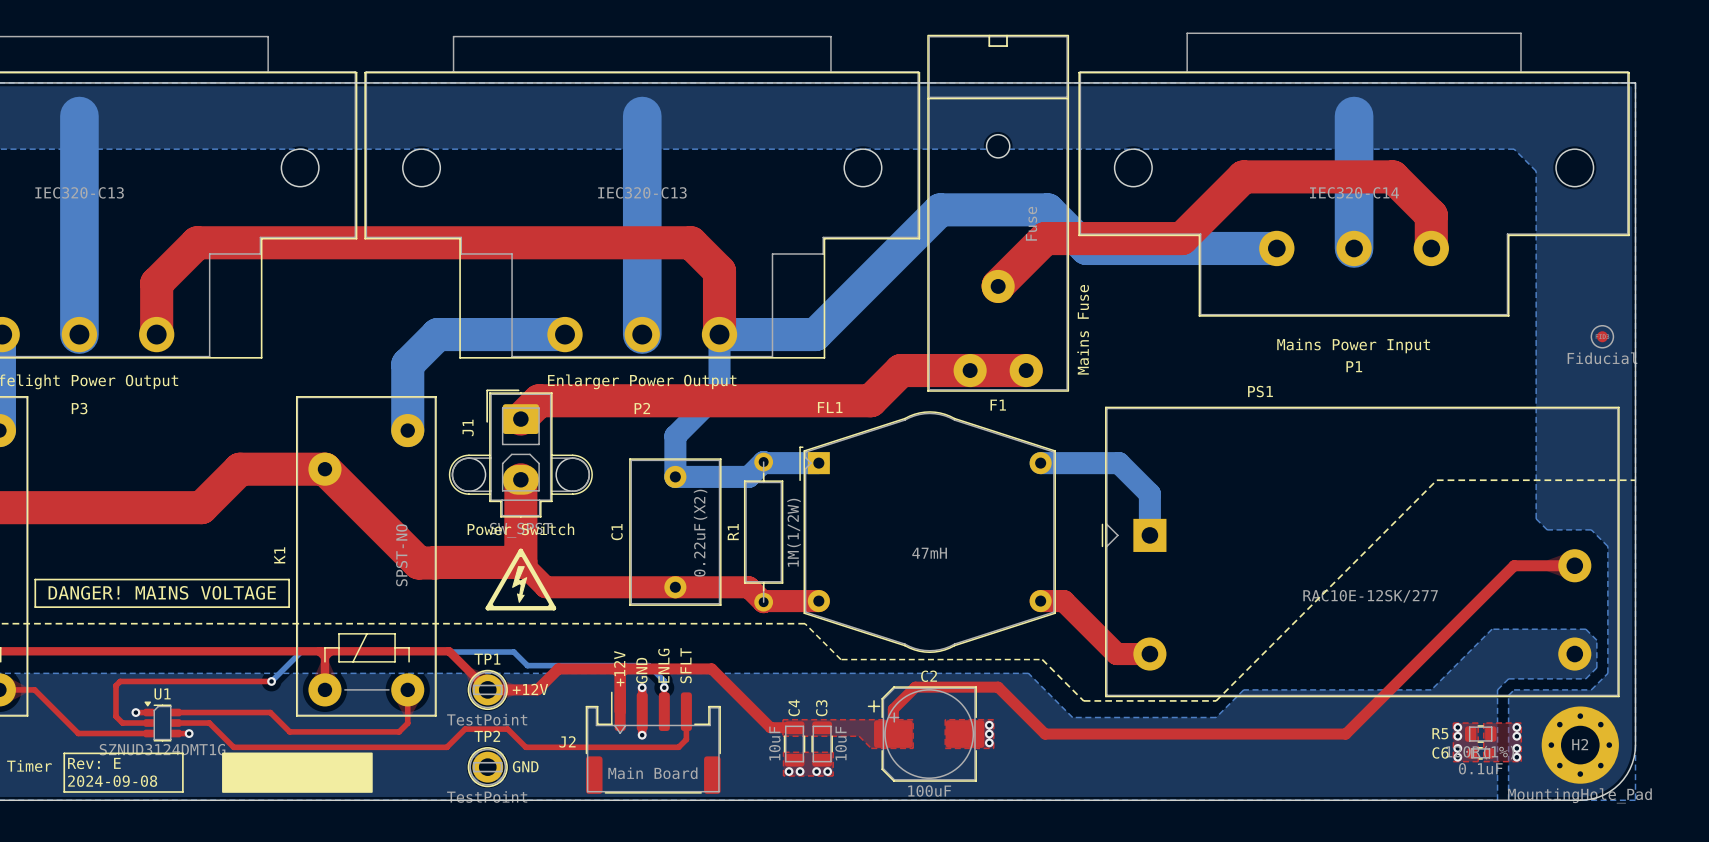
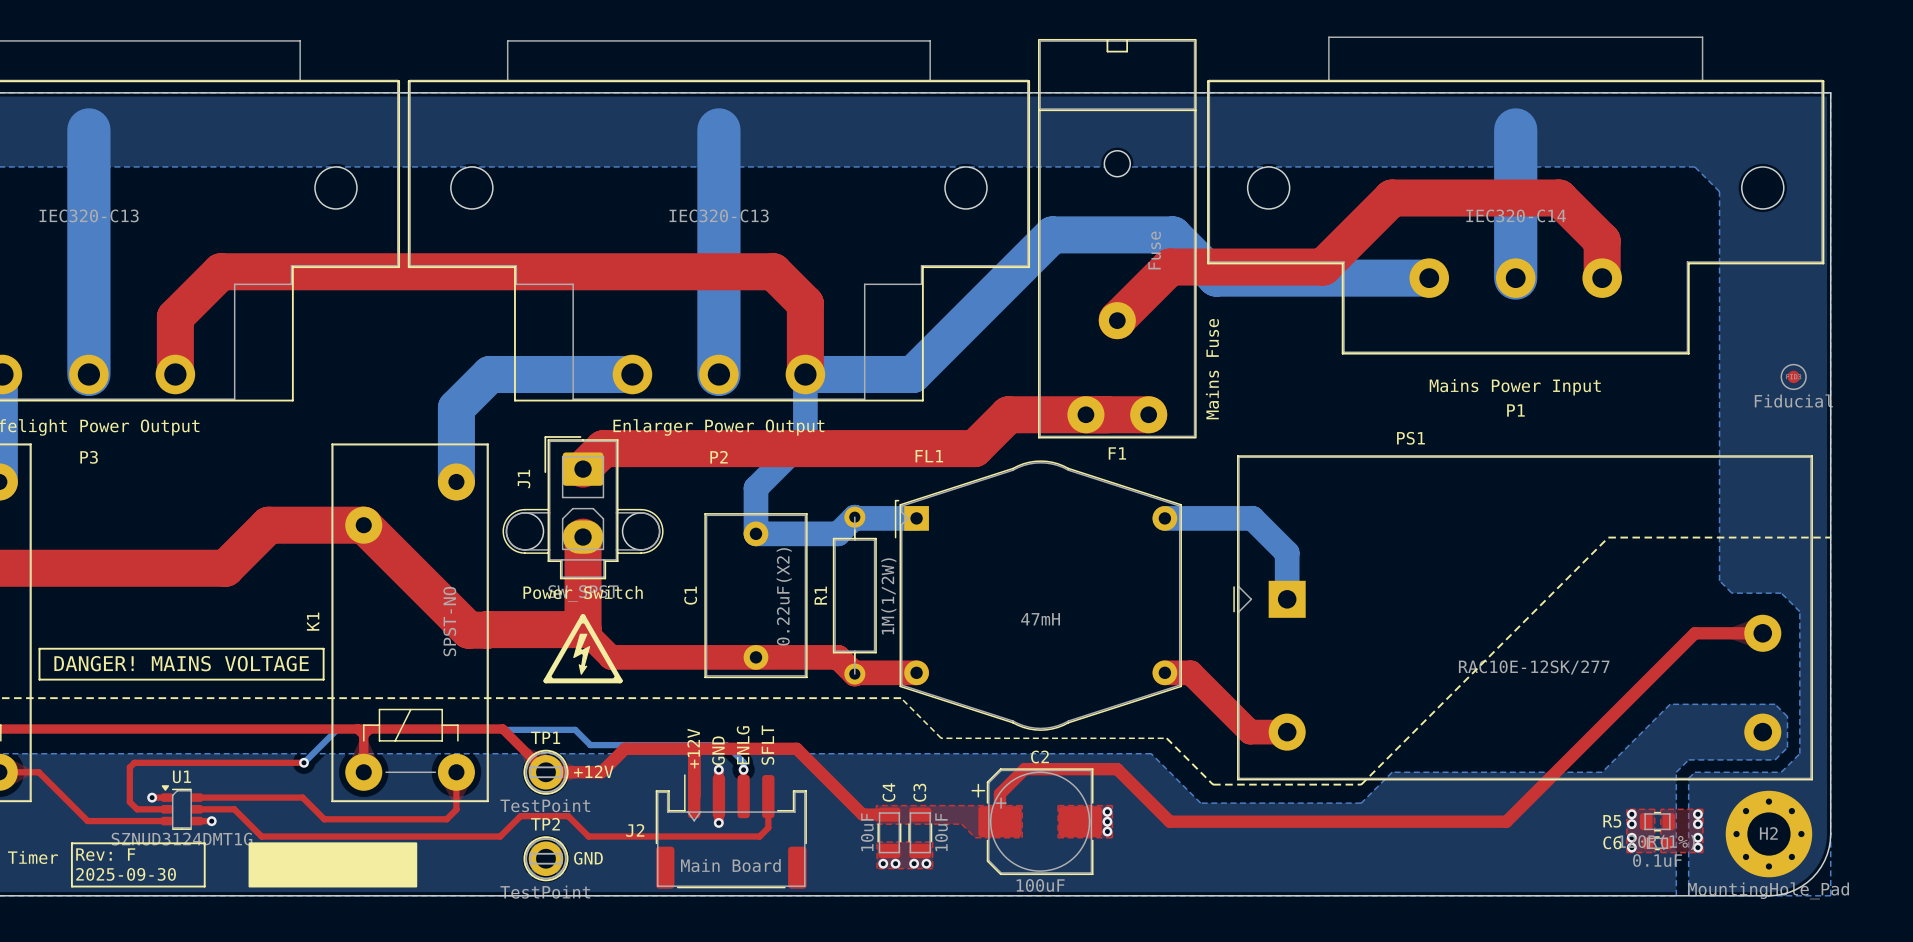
text: Rev: E (94, 763) -> Rev: F (105, 854)
text: 2024-09-08 (112, 781) -> 2025-09-30 (126, 874)

